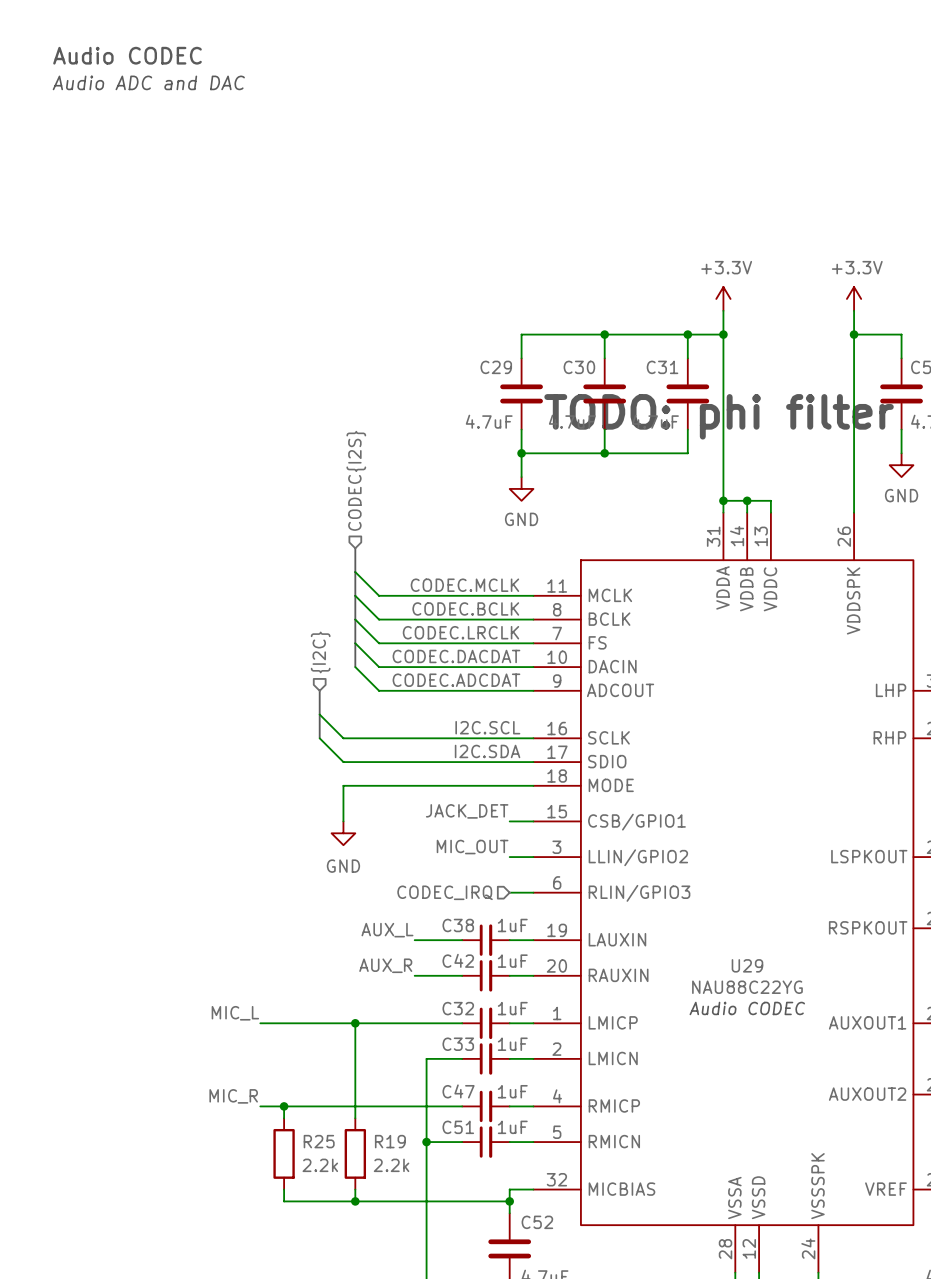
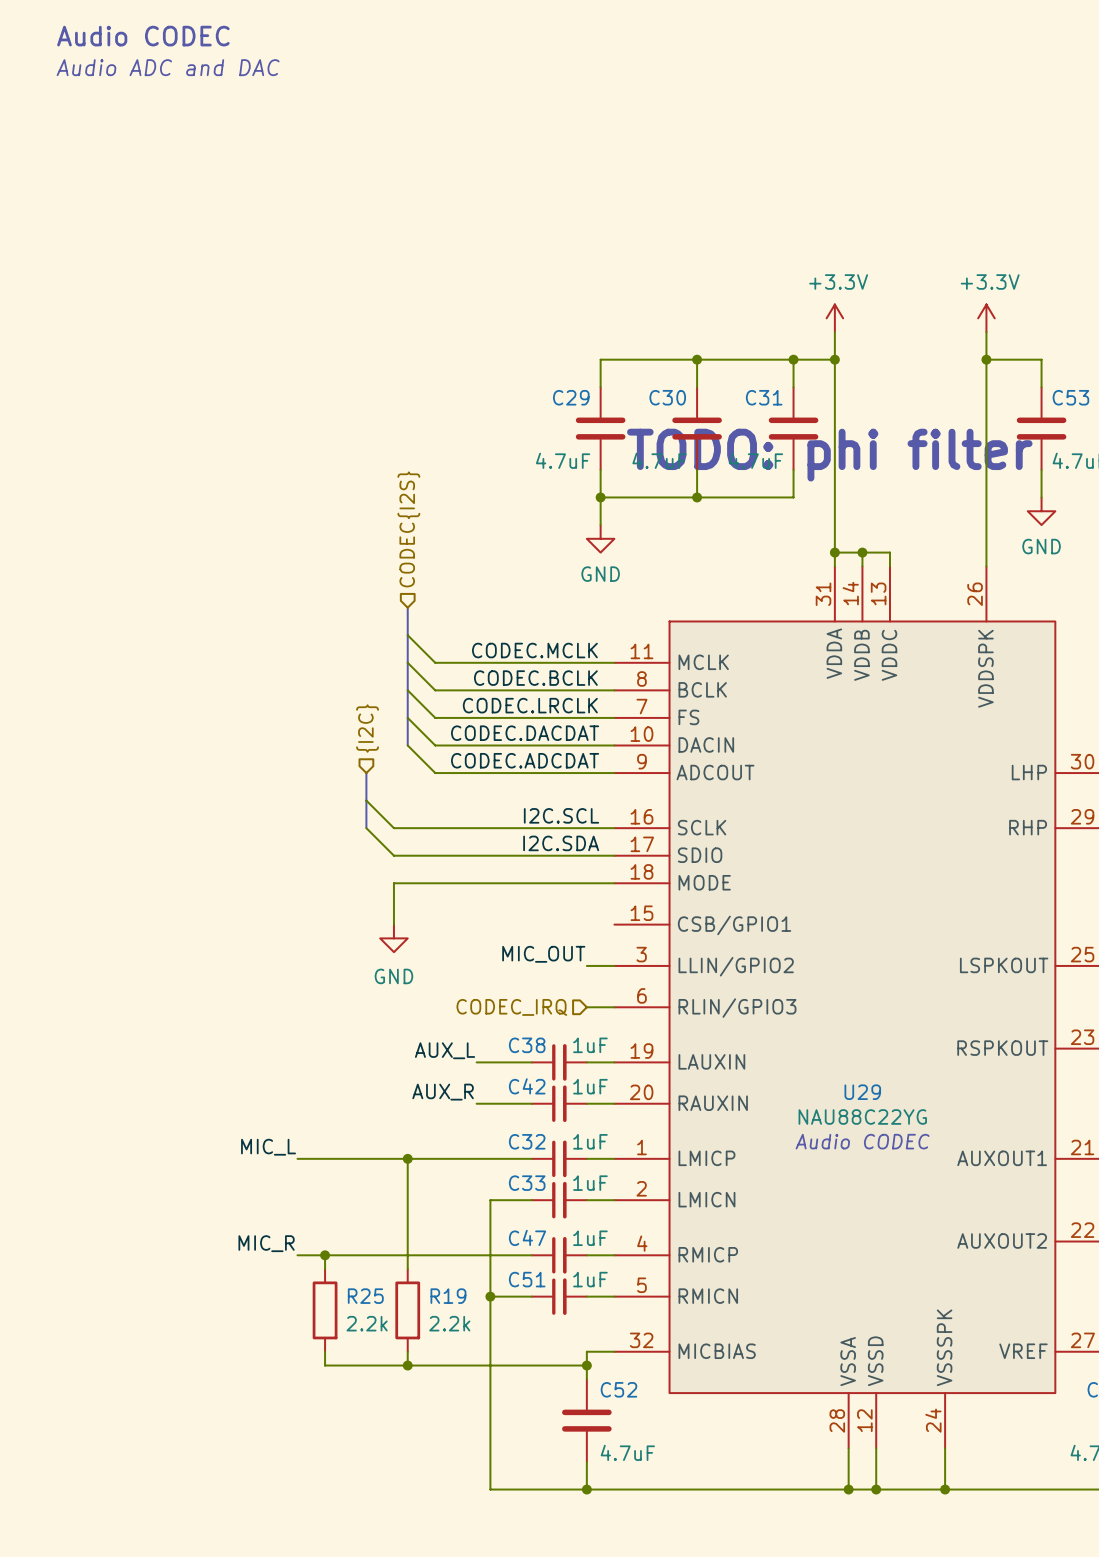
label: JACK_DET (467, 811) -> none
wire: (509, 821) (533, 821) -> none

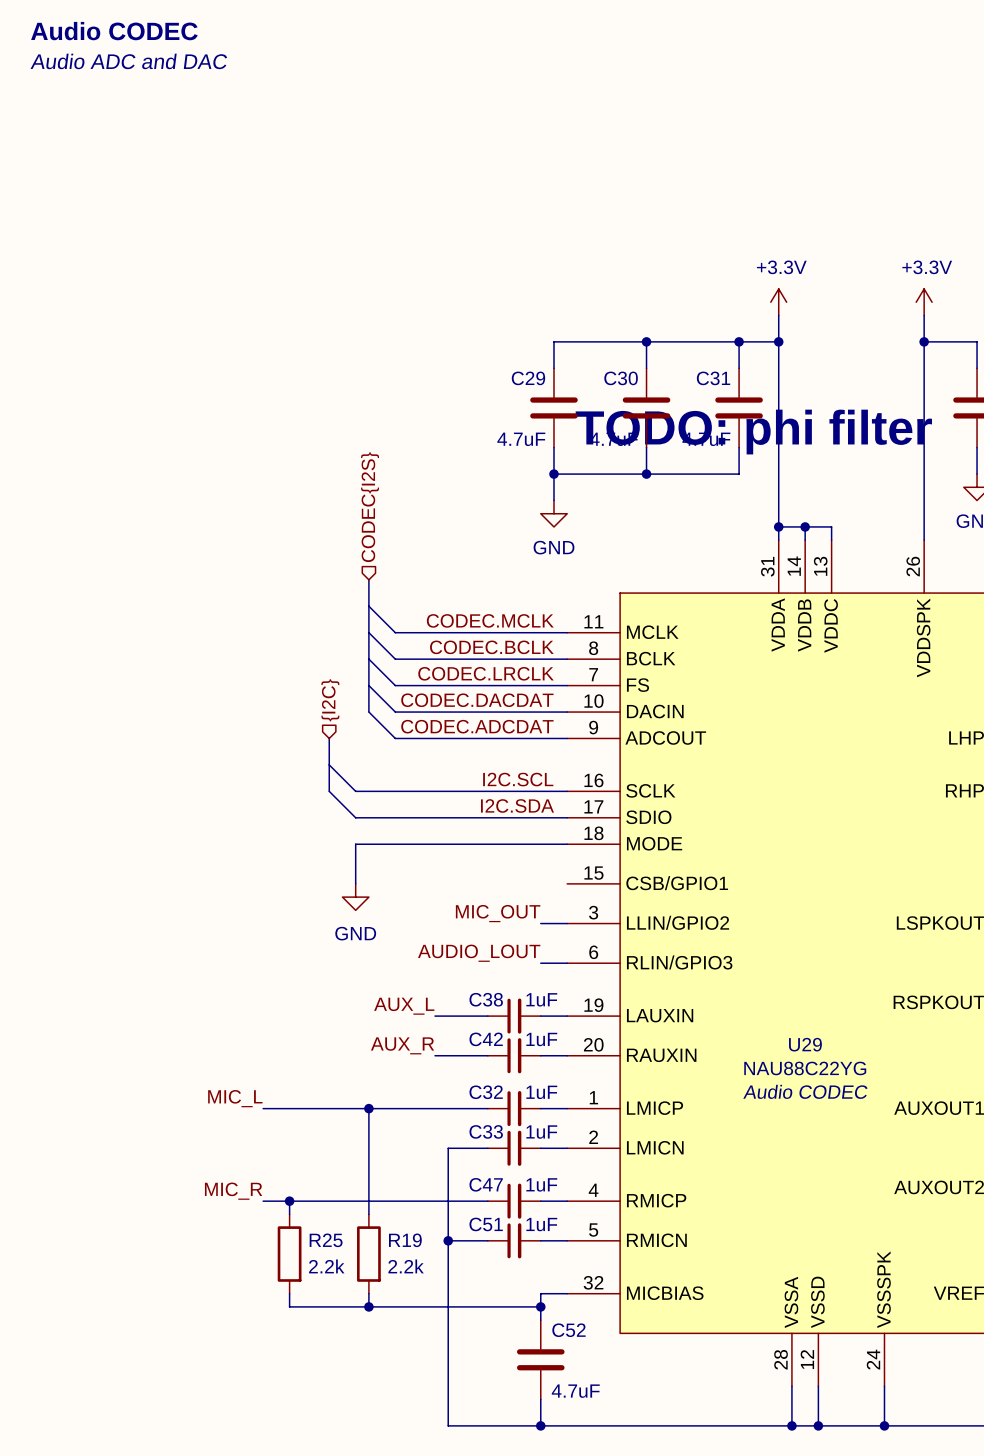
label: none -> AUDIO_LOUT (479, 953)
hierarchical label: CODEC_IRQ (511, 1007) -> none

